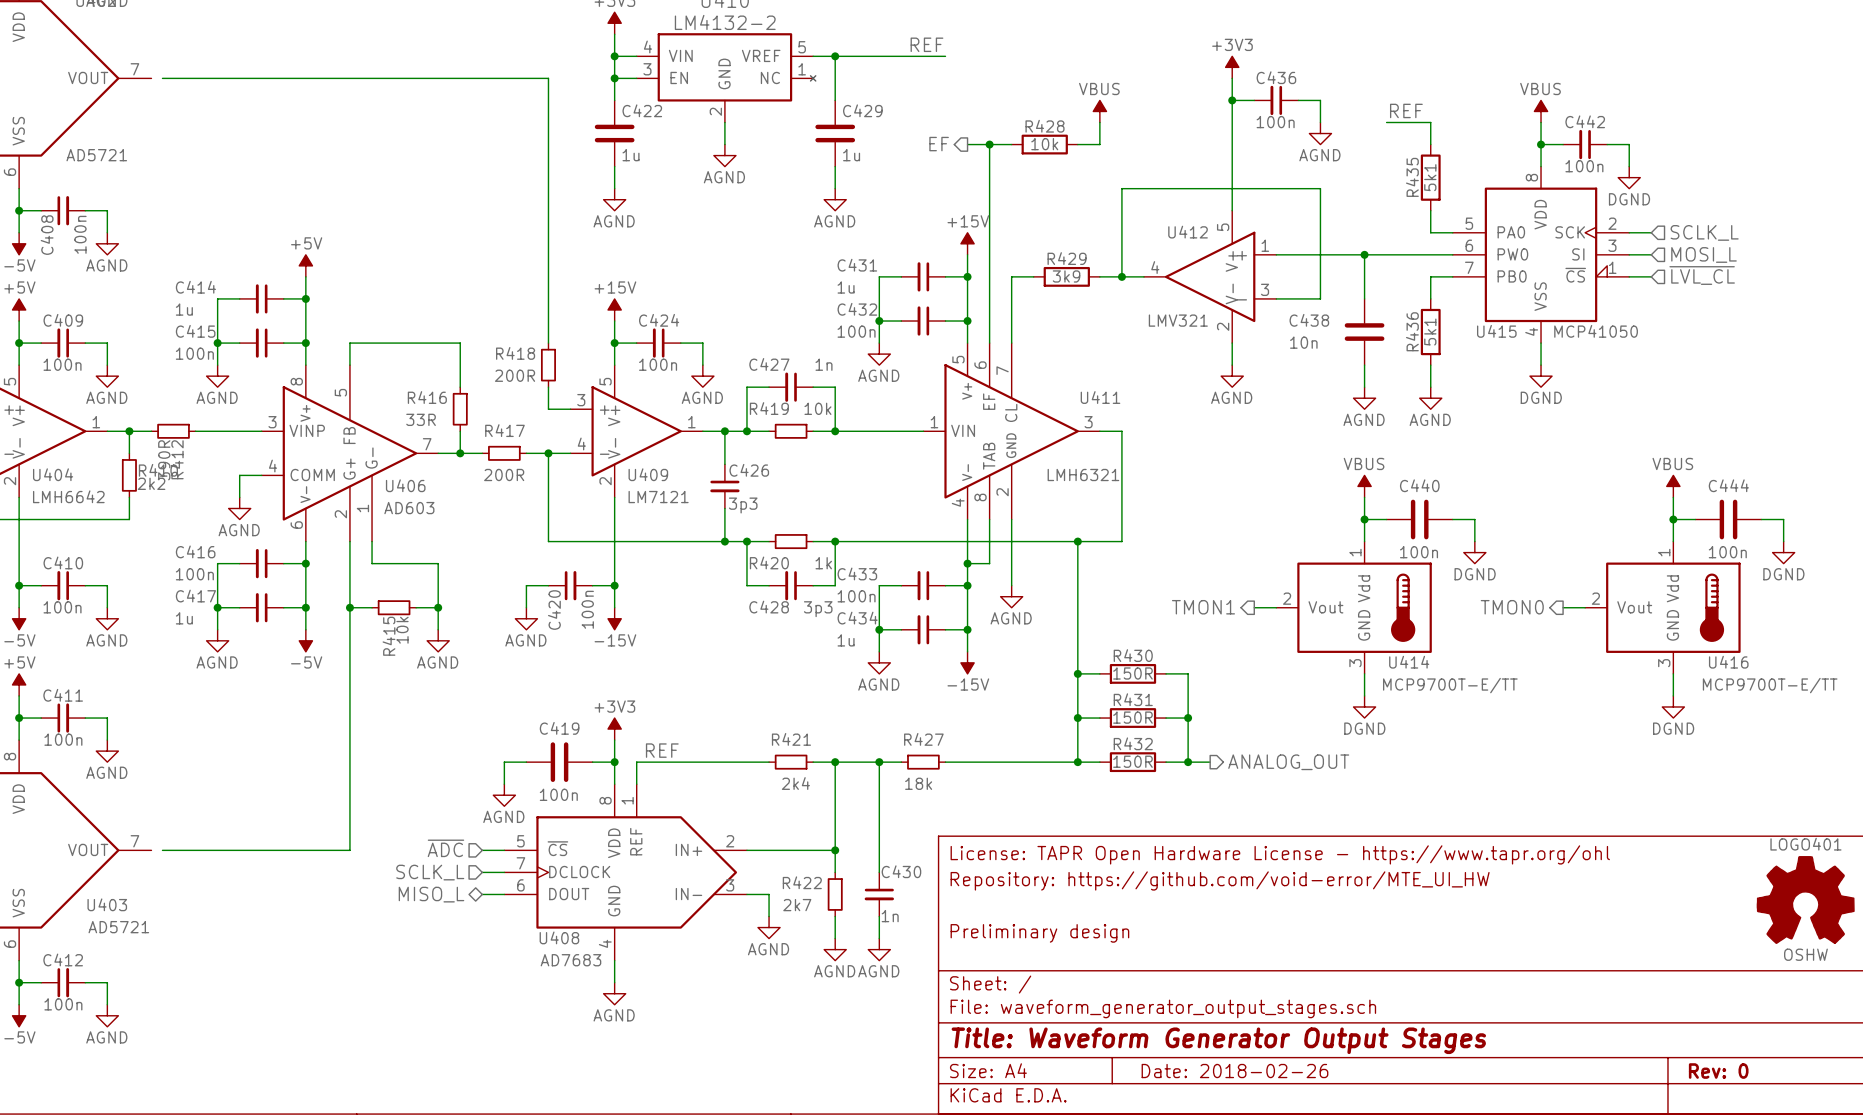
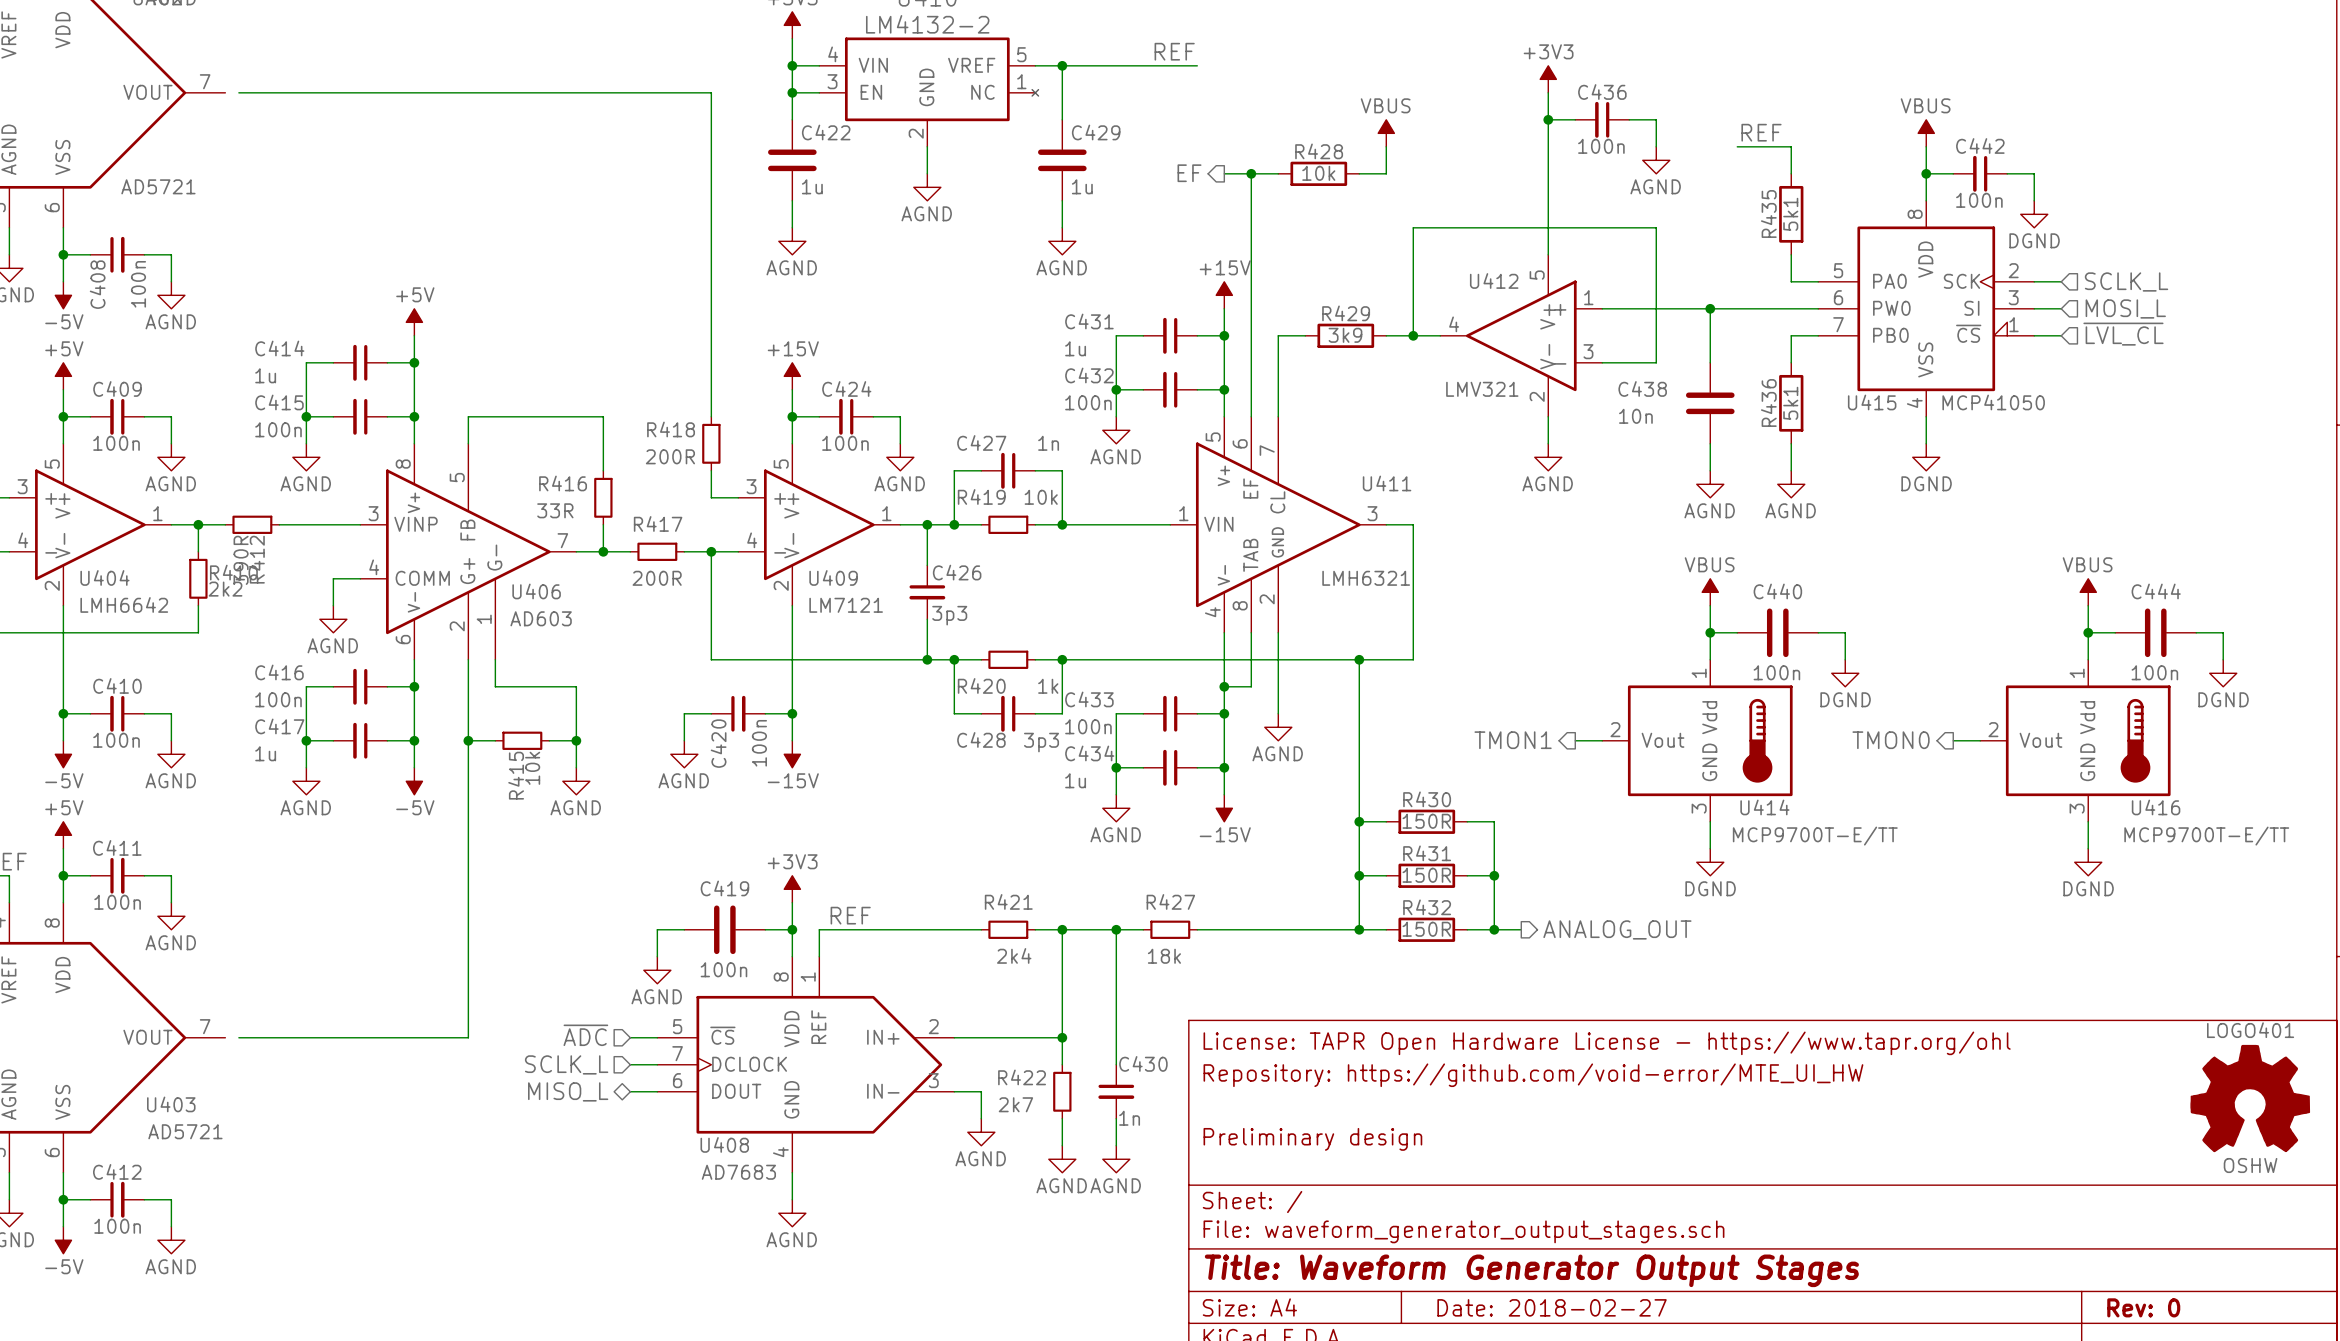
title block: Date: 2018-02-26 (1234, 1071) -> Date: 2018-02-27 (1552, 1307)

